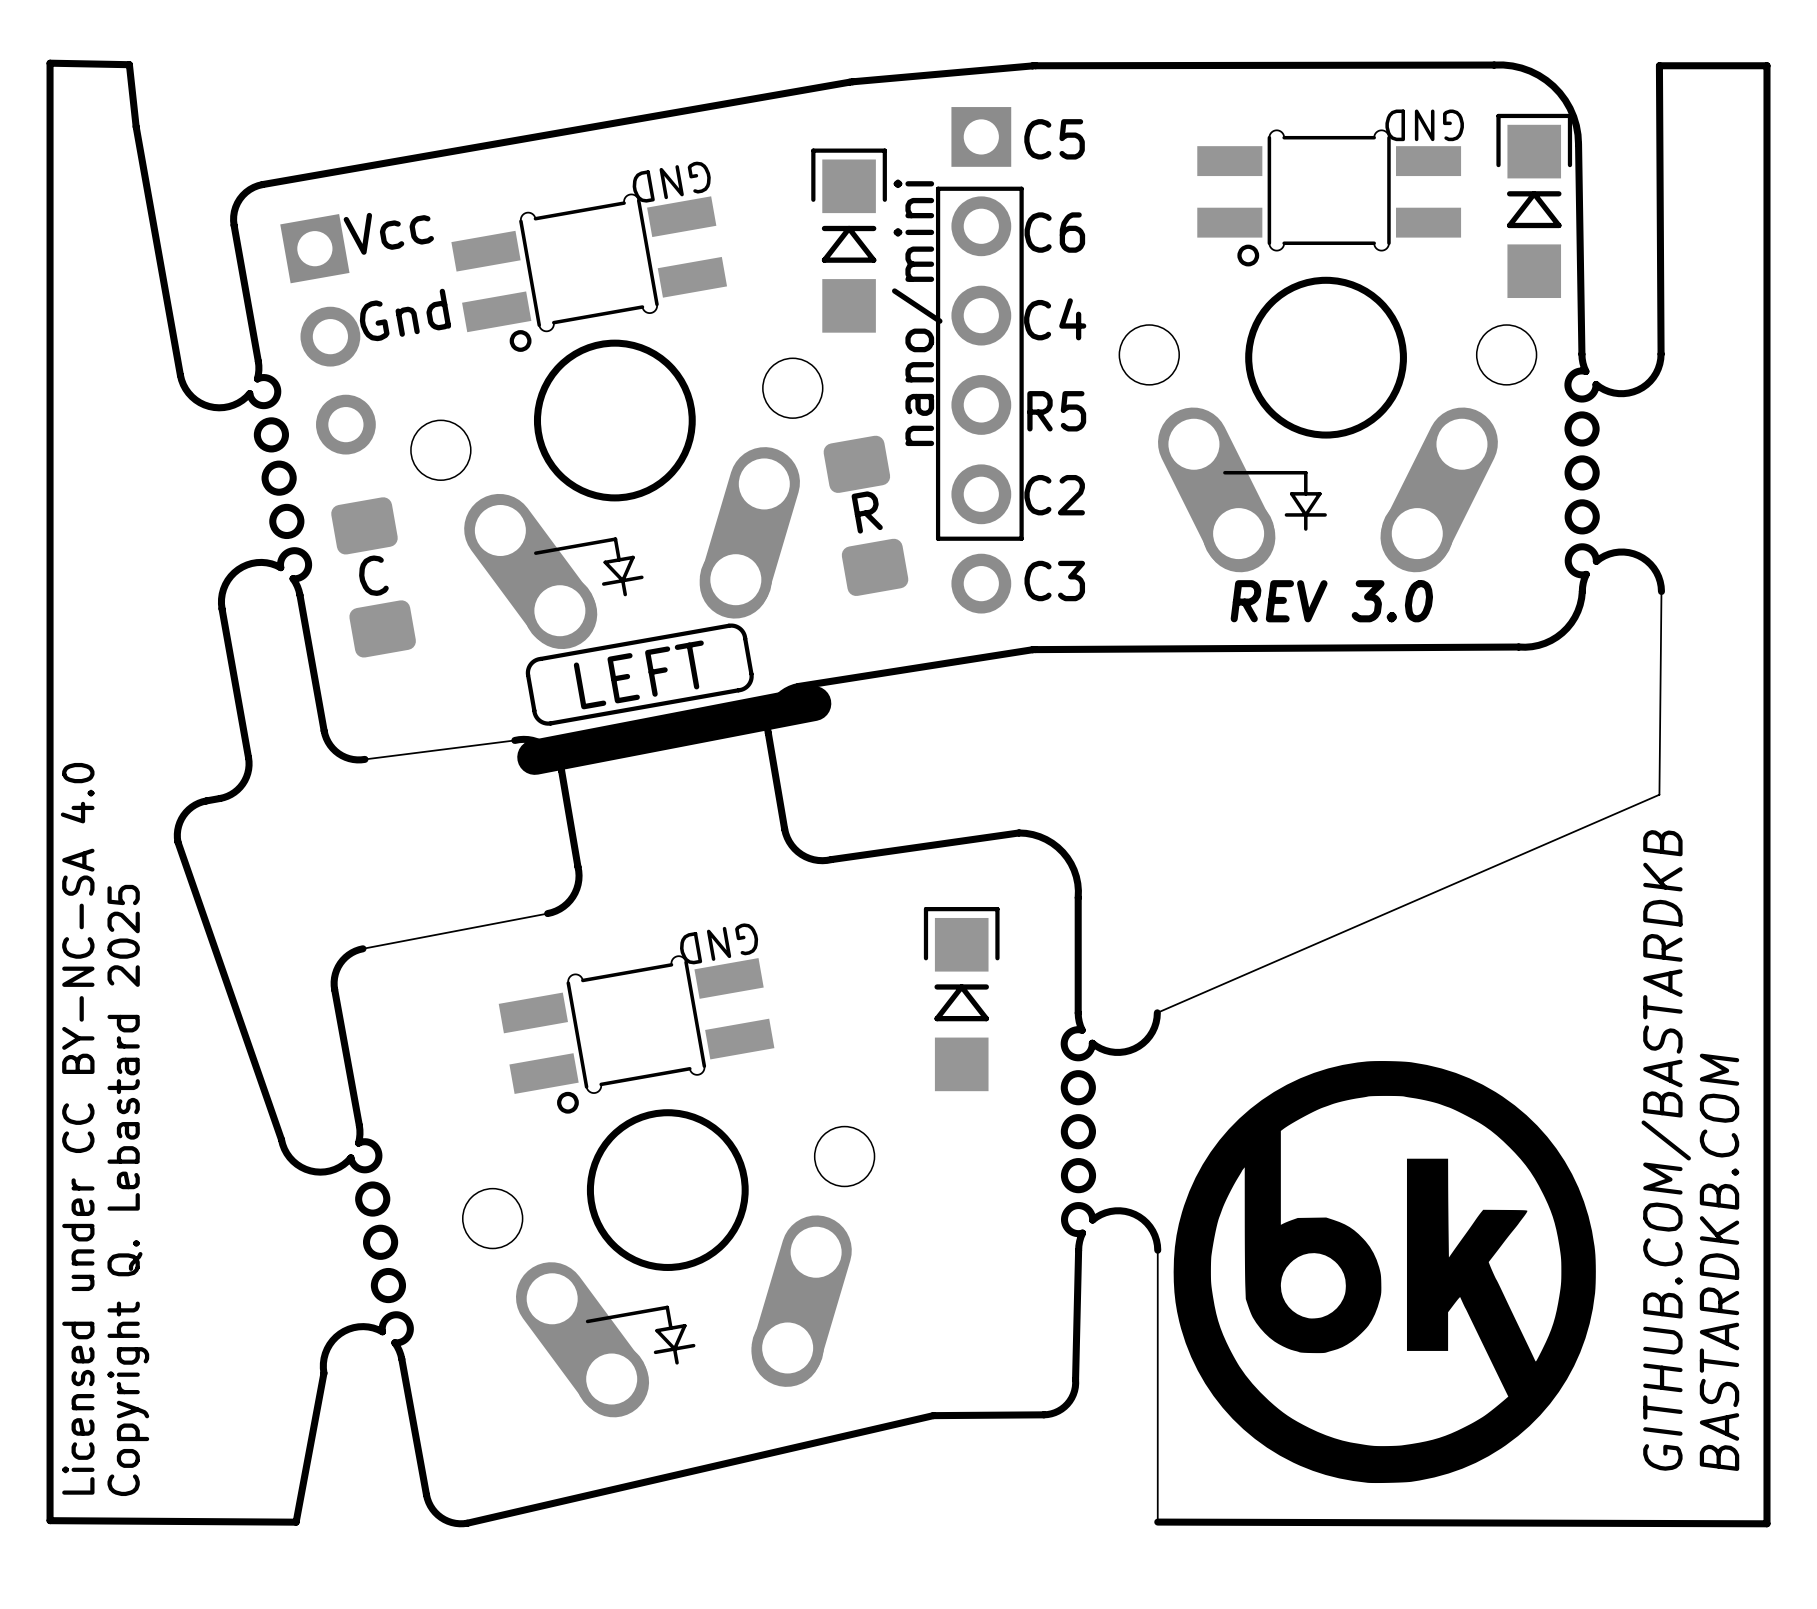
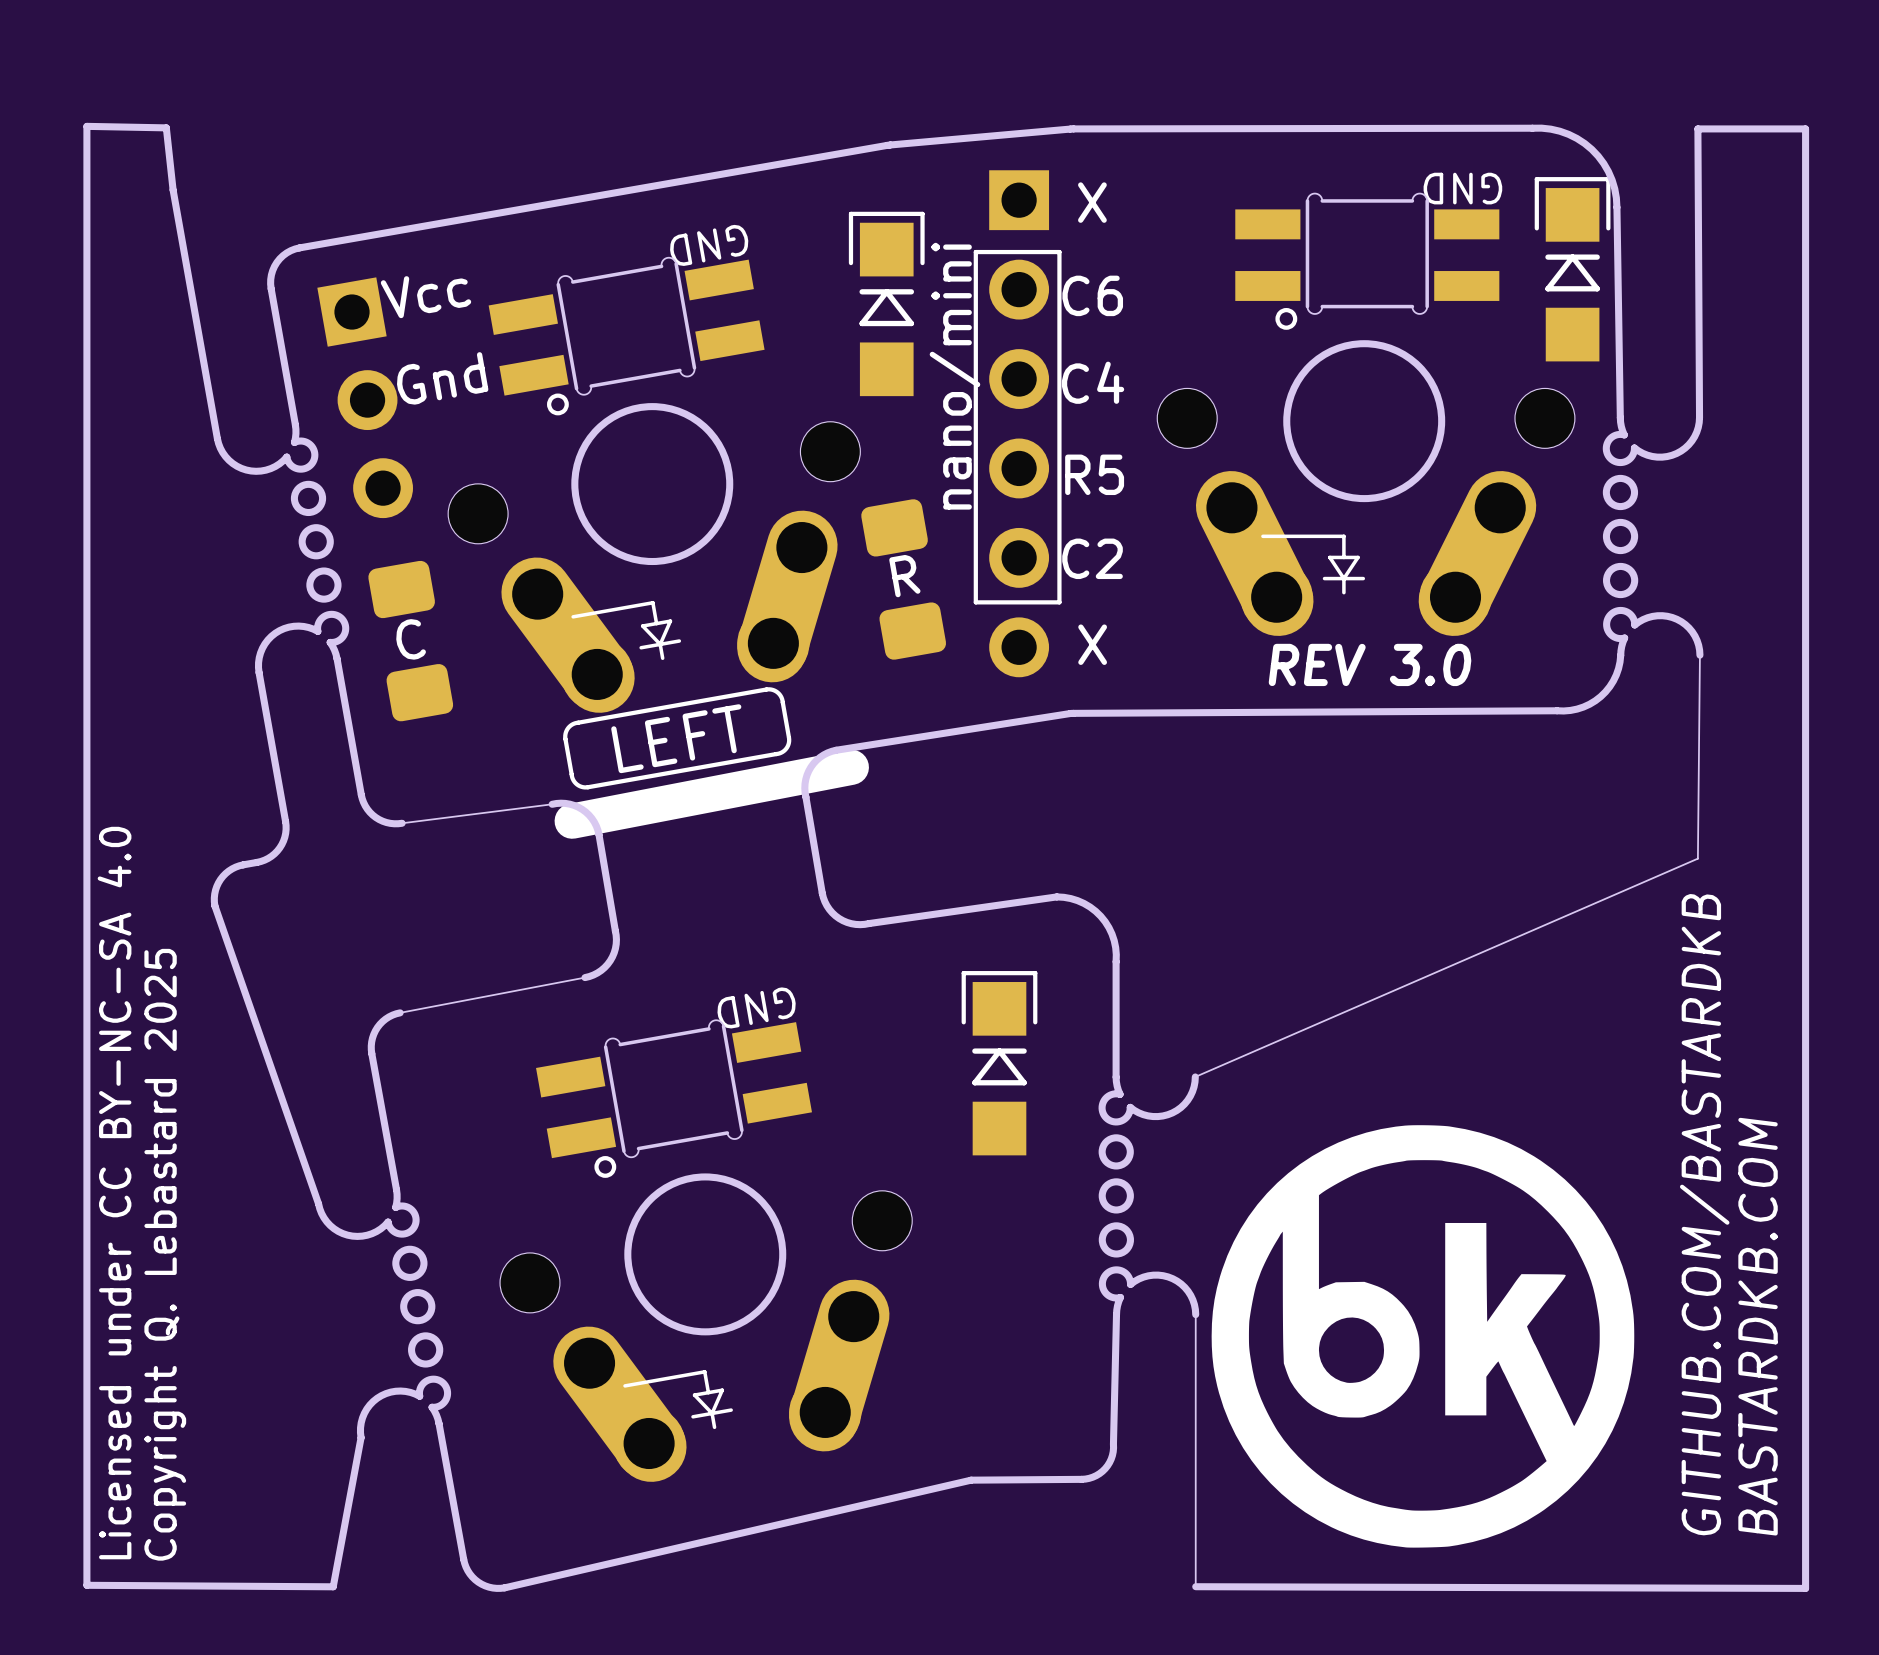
text: C5 (1054, 139) -> X (1092, 202)
text: C3 (1054, 581) -> X (1092, 644)

